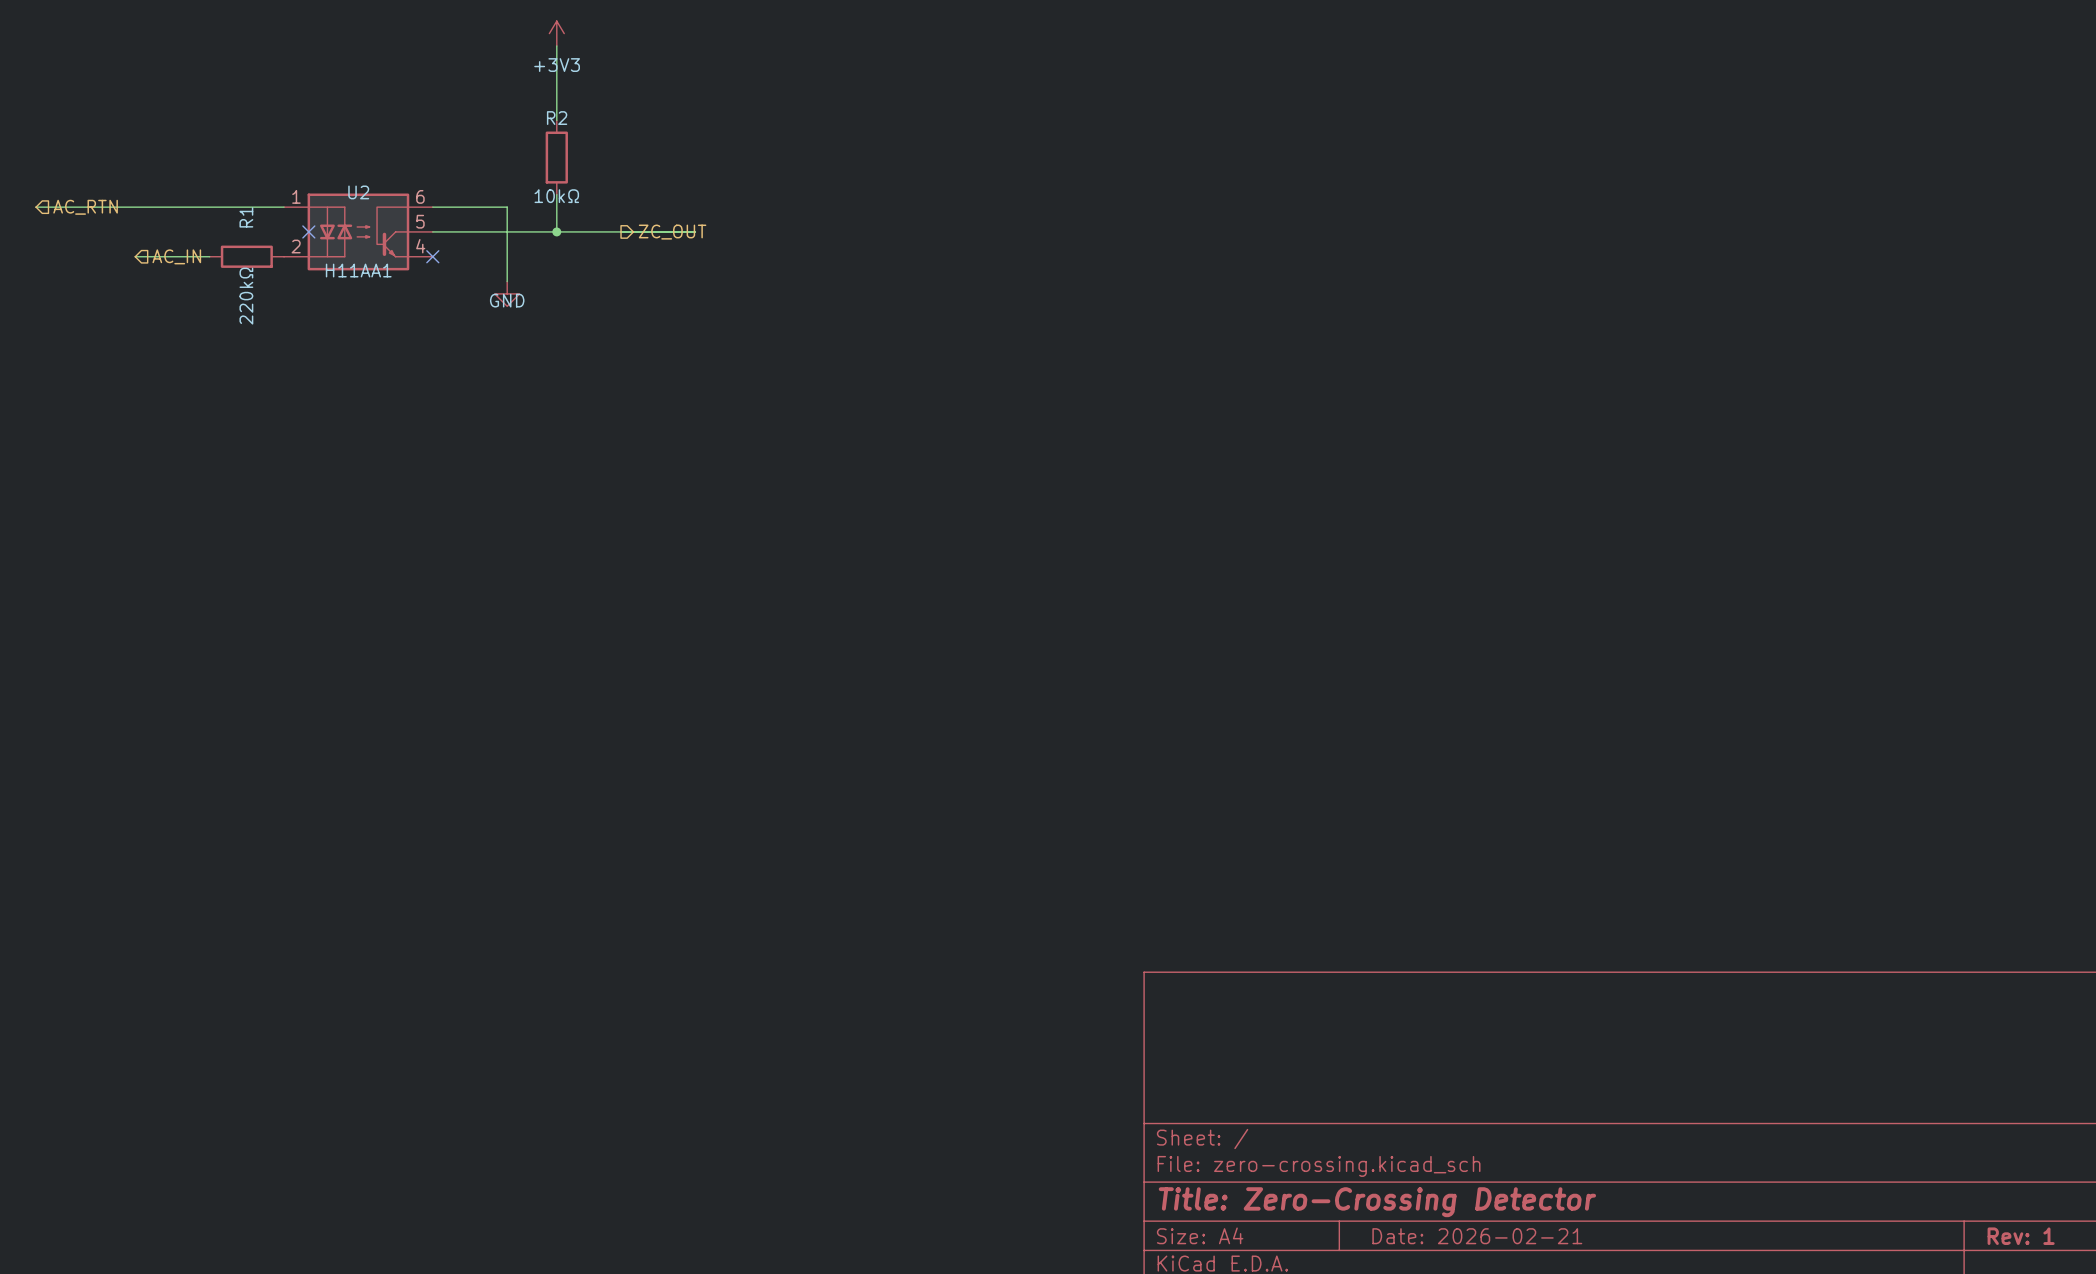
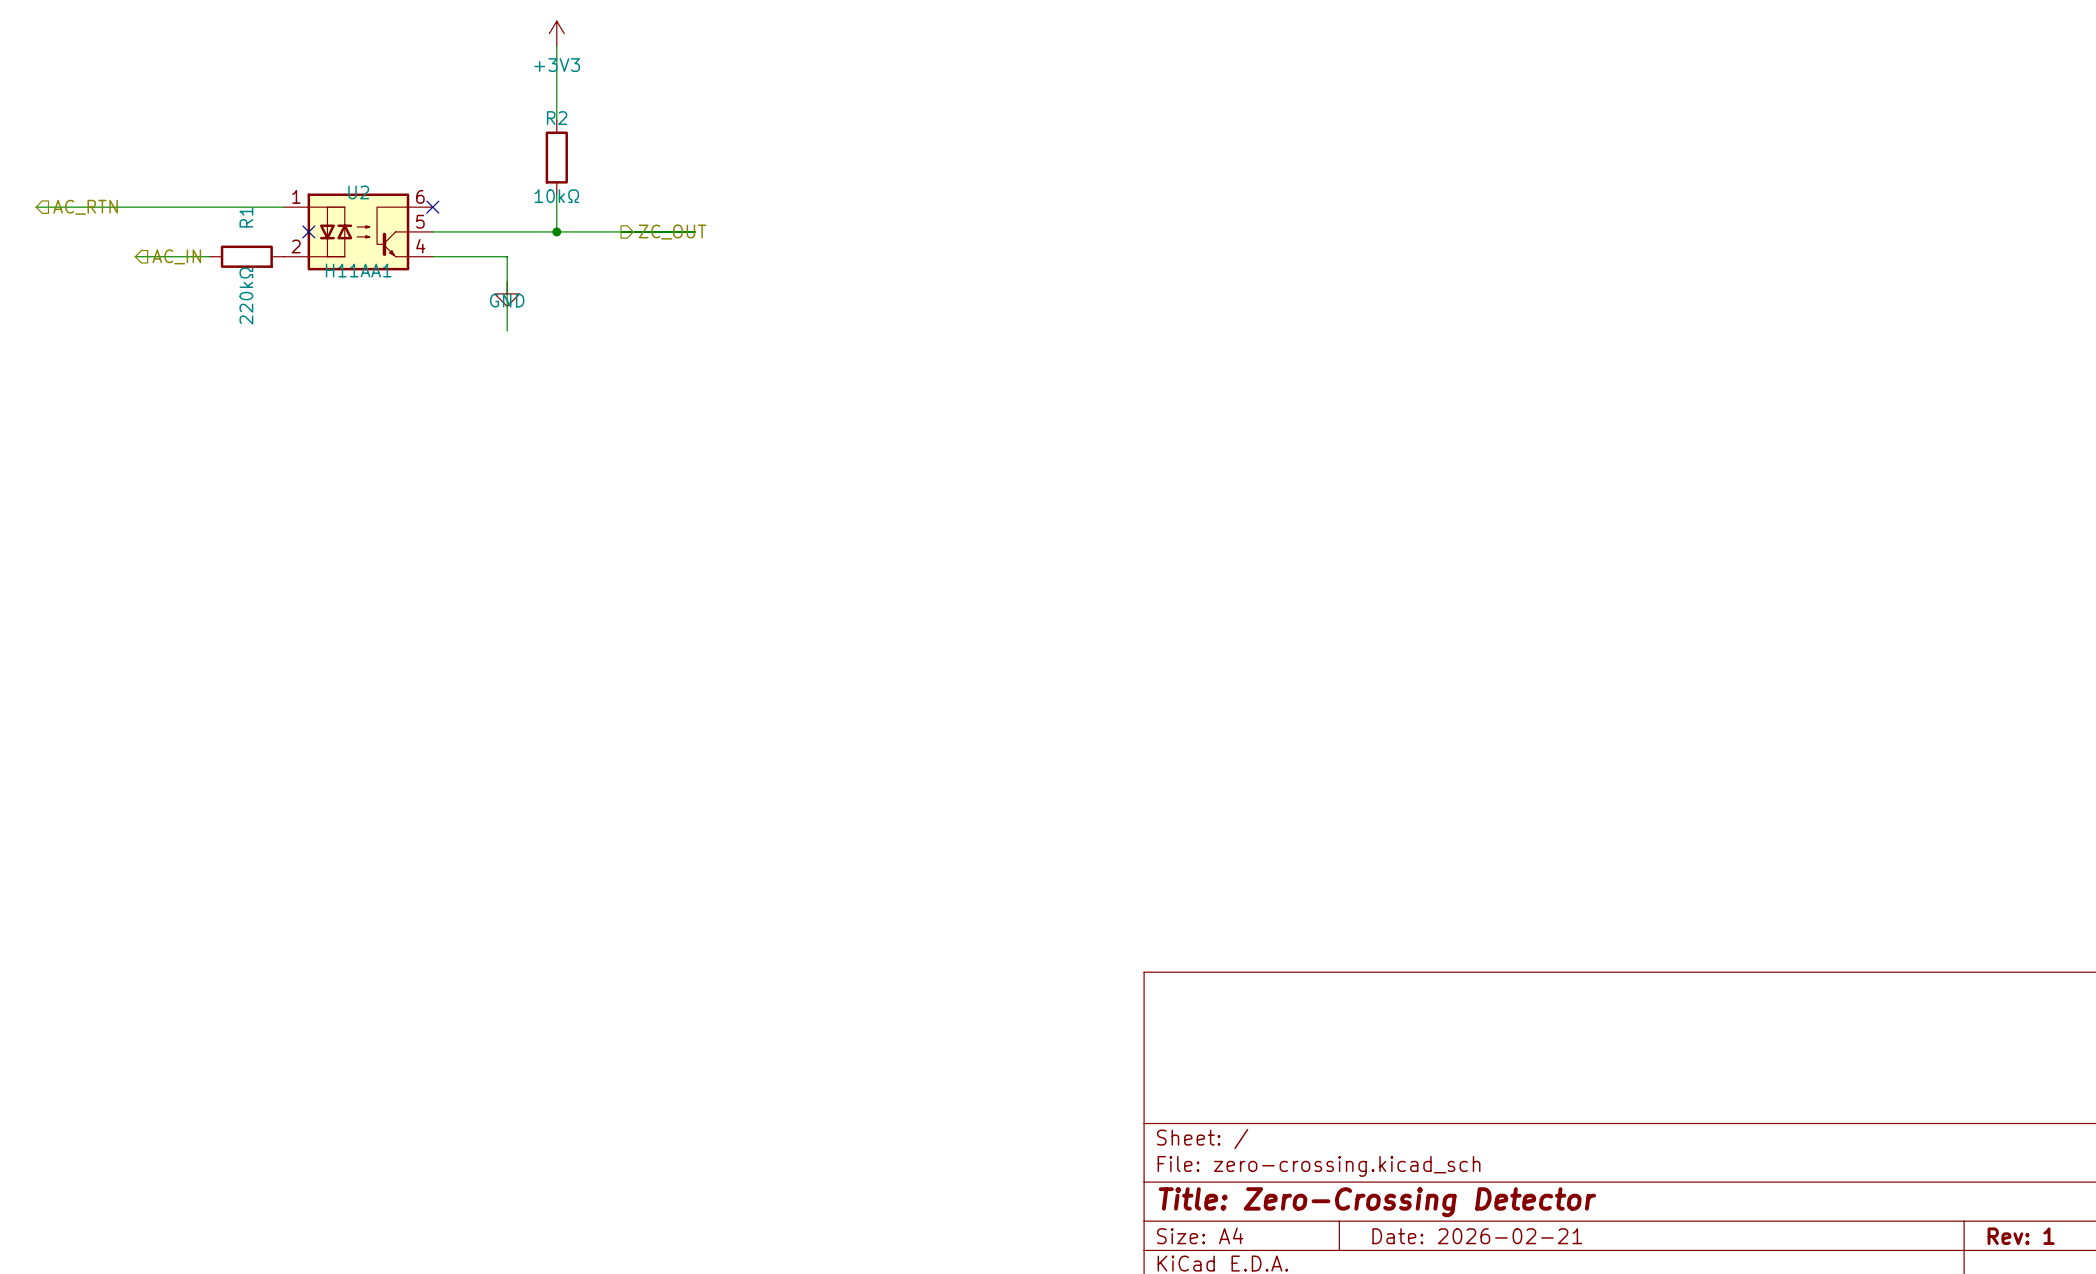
wire: (432, 207) (507, 207) (507, 256) -> (432, 256) (507, 256)
no-connect mark position: (432, 256) -> (432, 207)
wire: none -> (507, 281) (507, 331)

